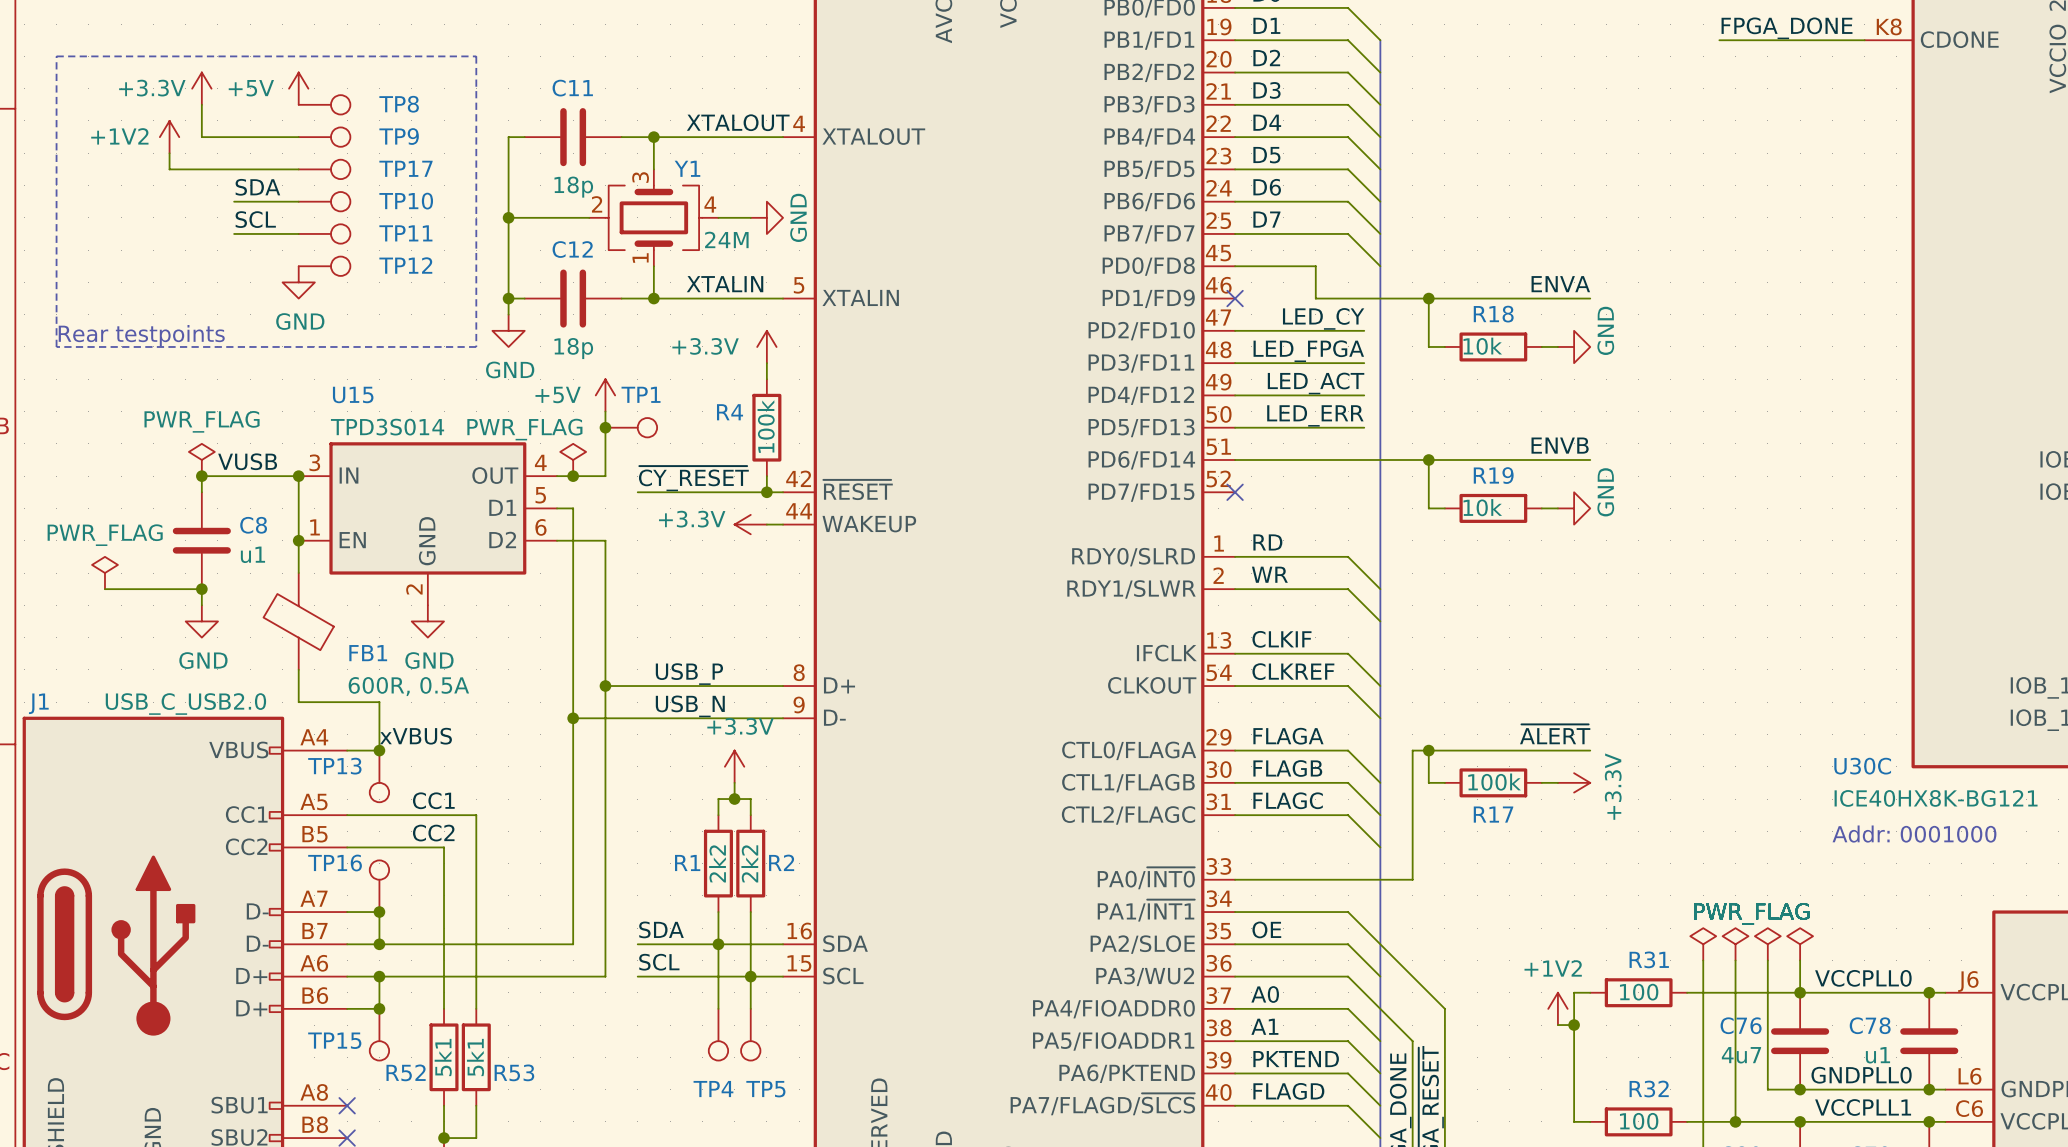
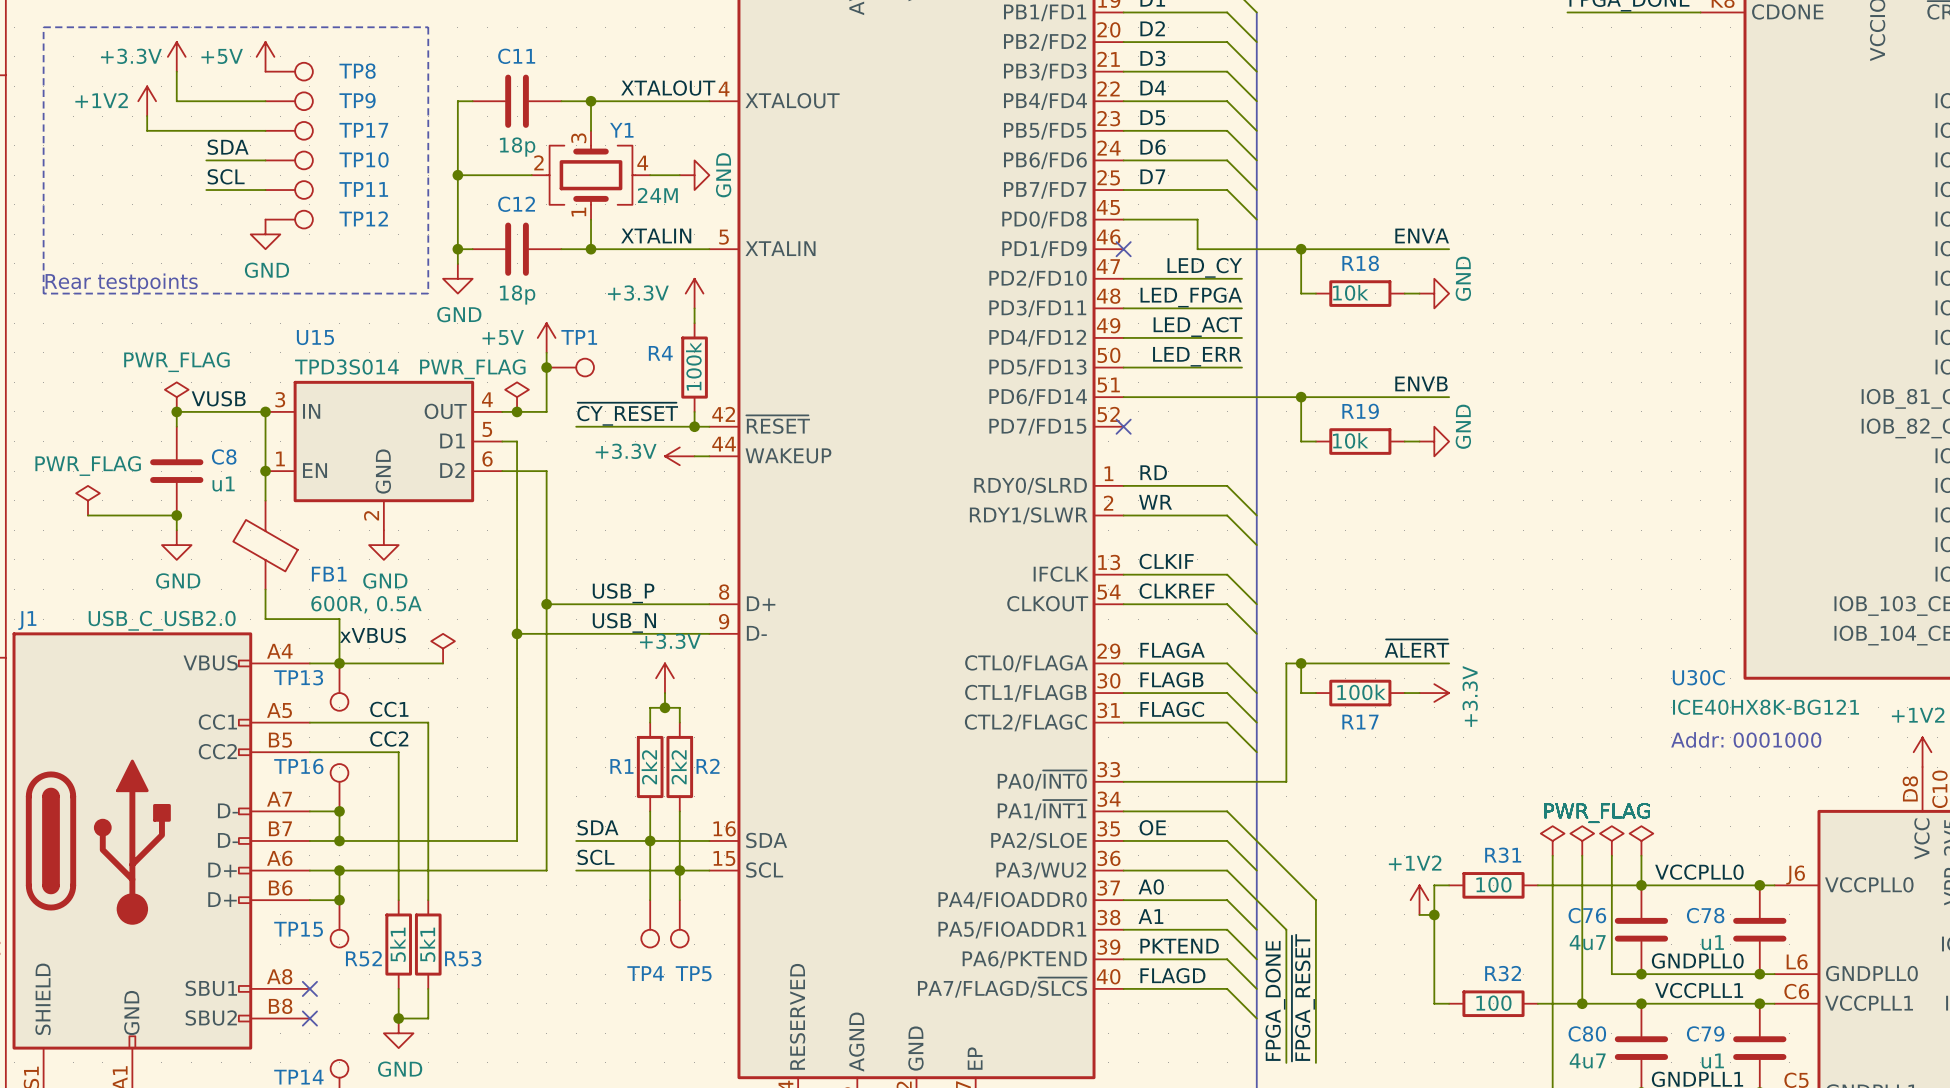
power symbol: none -> (443, 648)
label position: xVBUS (415, 736) -> xVBUS (373, 635)
wire: none -> (339, 663) (443, 663)

